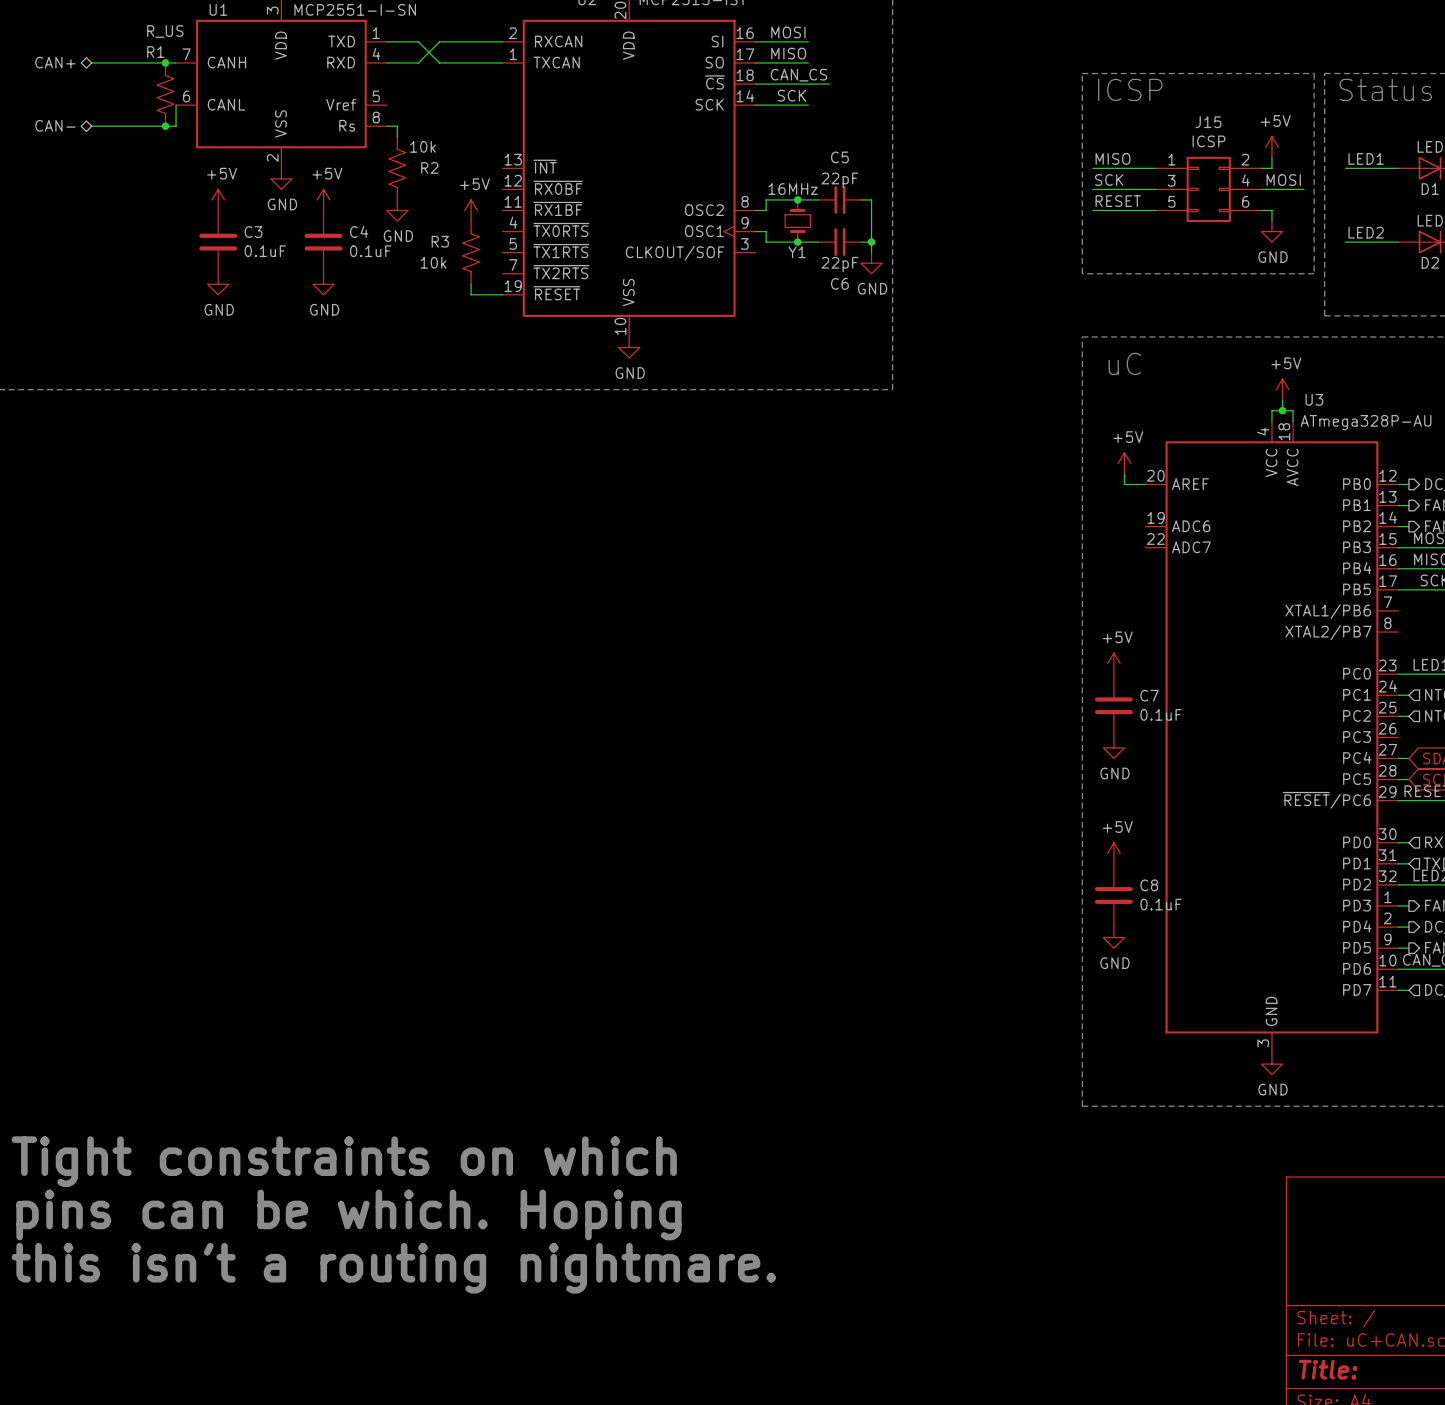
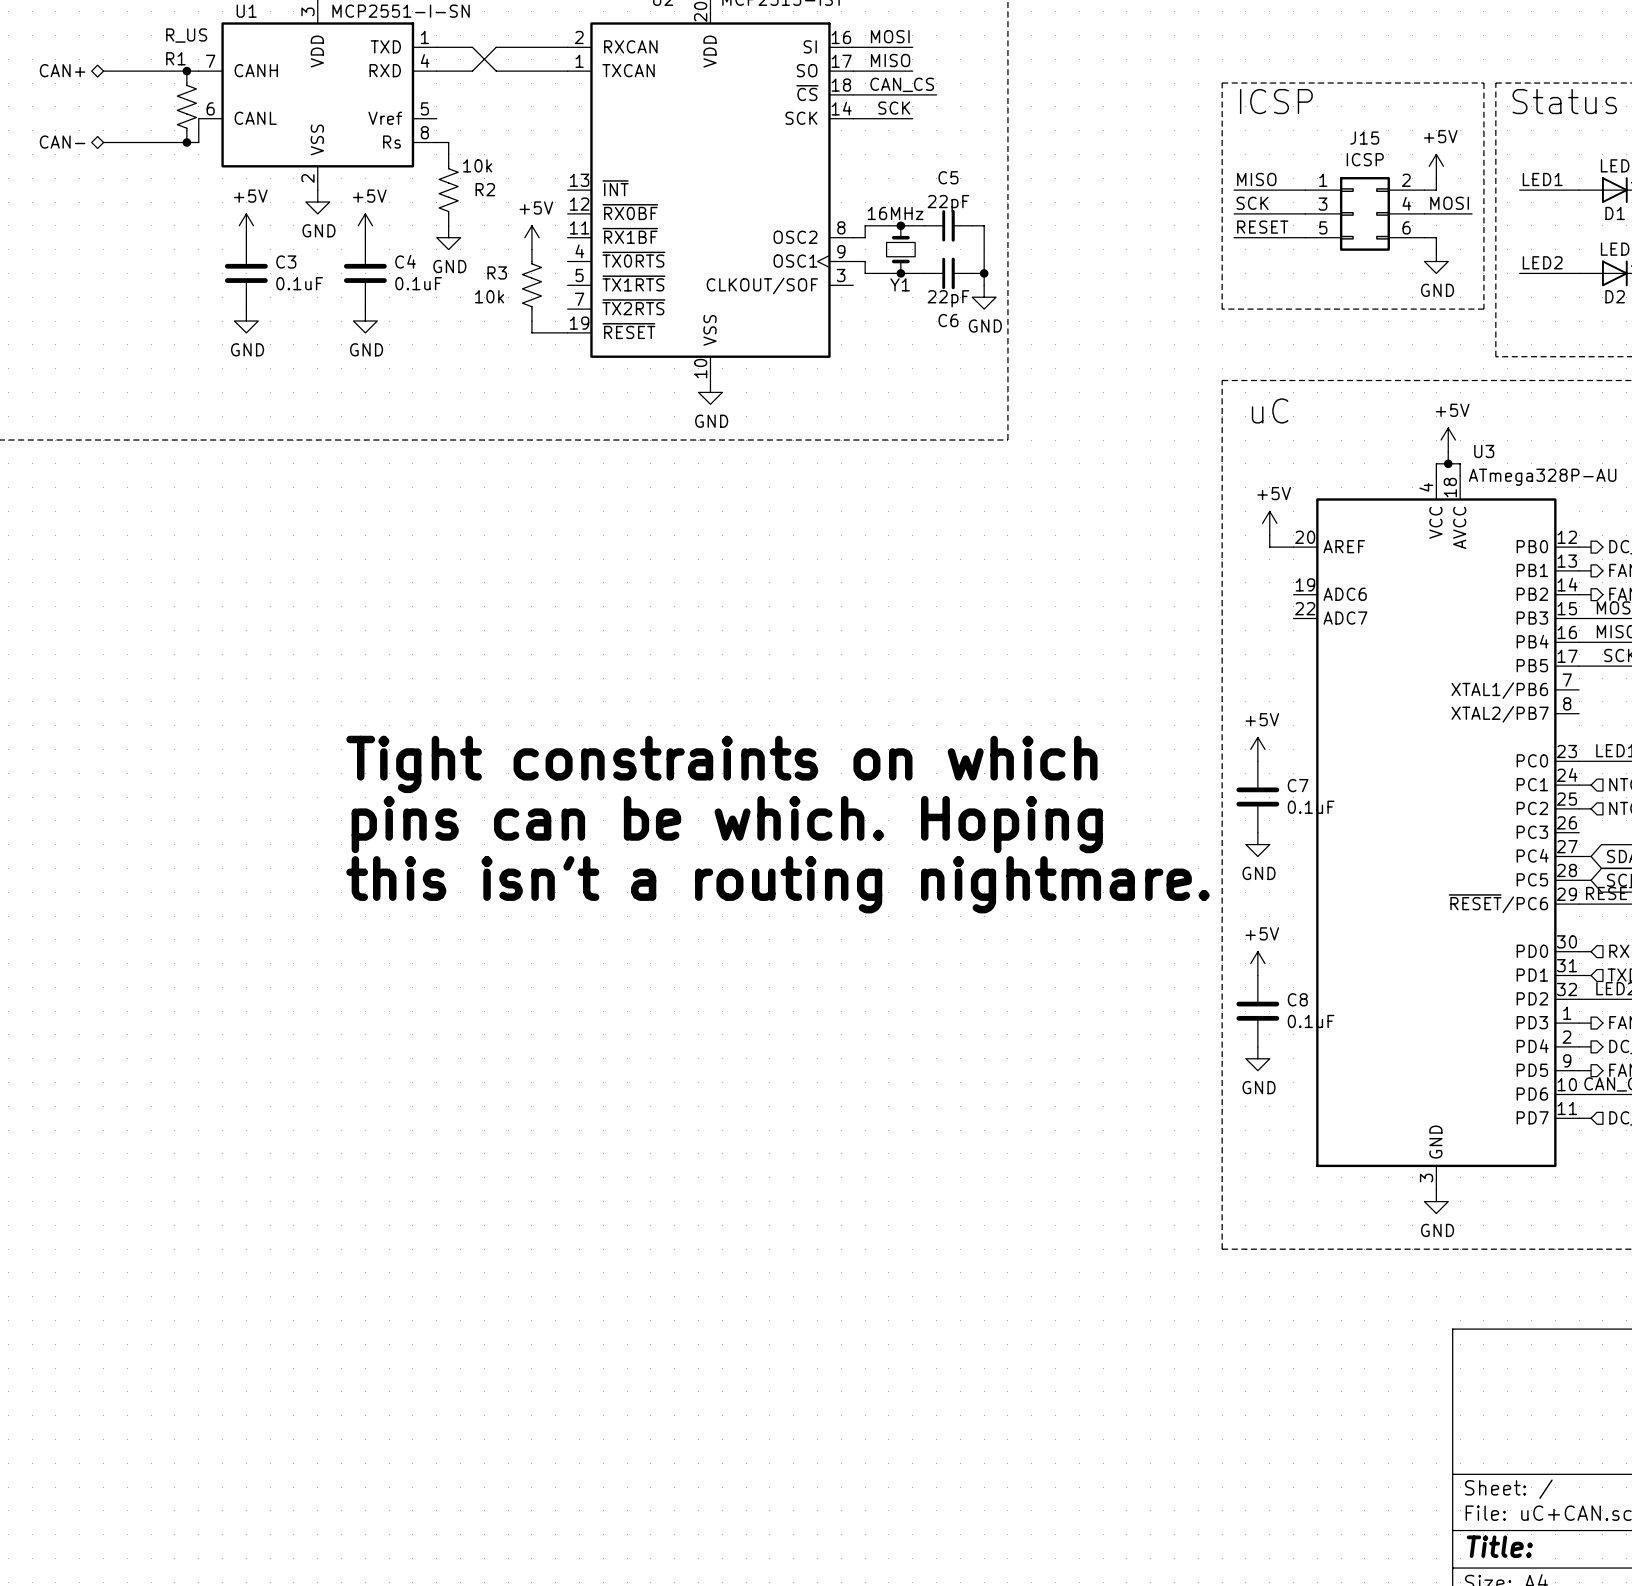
text: none -> Tight constraints on which (721, 764)
text: none -> pins can be which. Hoping (727, 824)
text: none -> this isn't a routing nightmare. (777, 884)
text: Tight constraints on which (344, 1161) -> none
text: pins can be which. Hoping (348, 1214) -> none
text: this isn't a routing nightmare. (393, 1268) -> none

